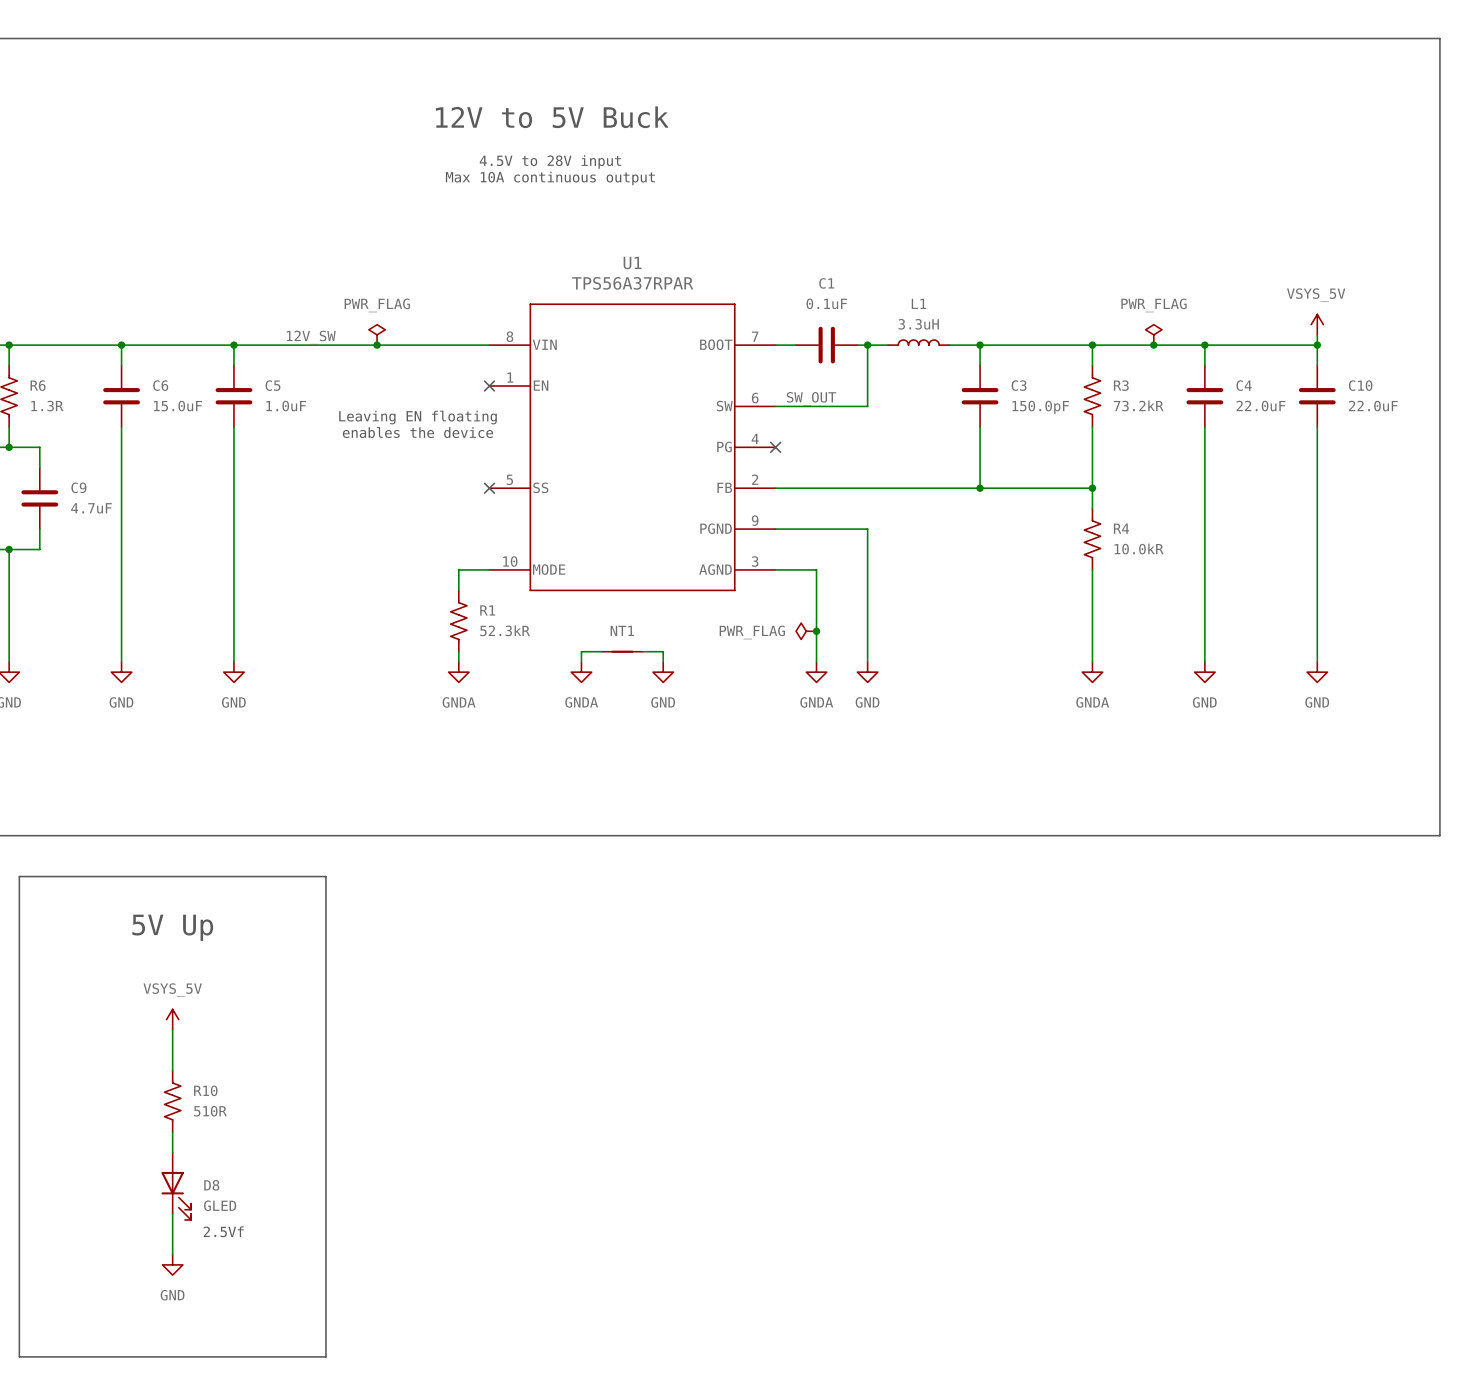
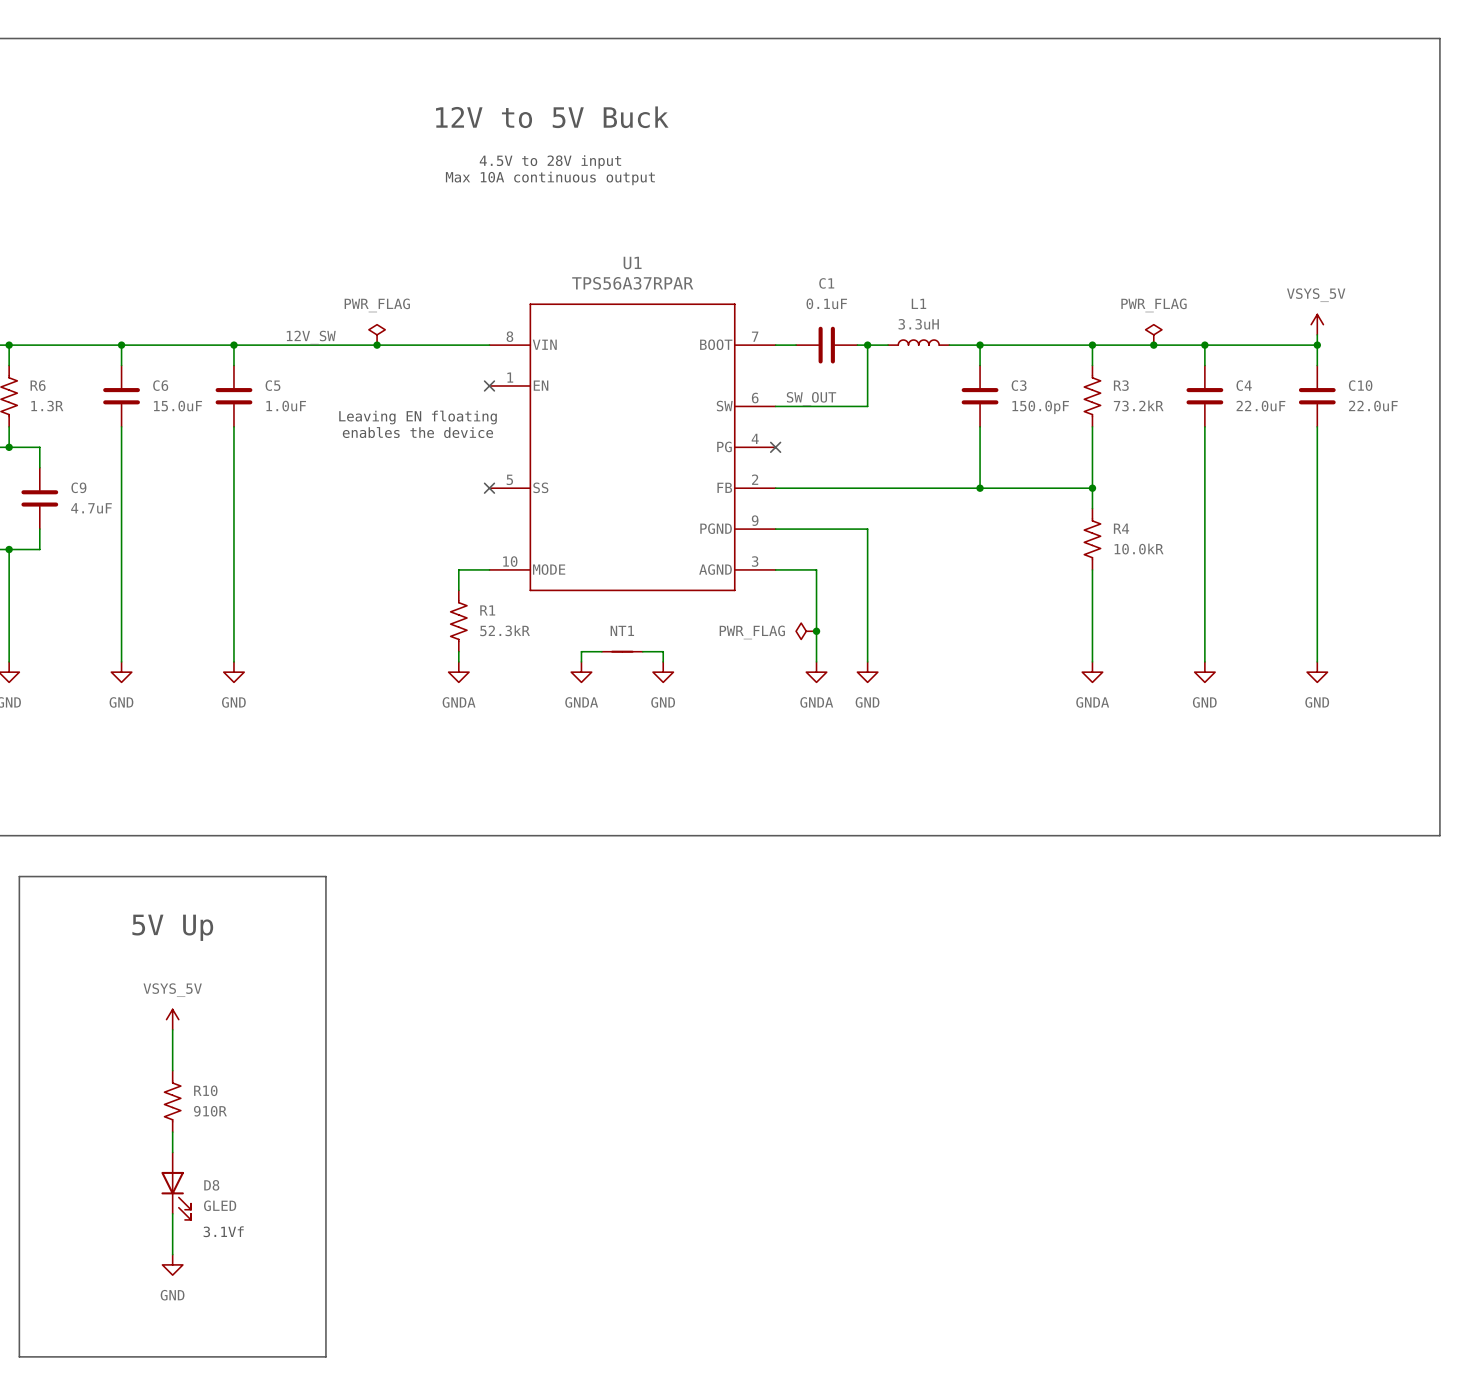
R10 value: 510R (210, 1111) -> 910R (210, 1111)
text: 2.5Vf (223, 1231) -> 3.1Vf (223, 1231)

